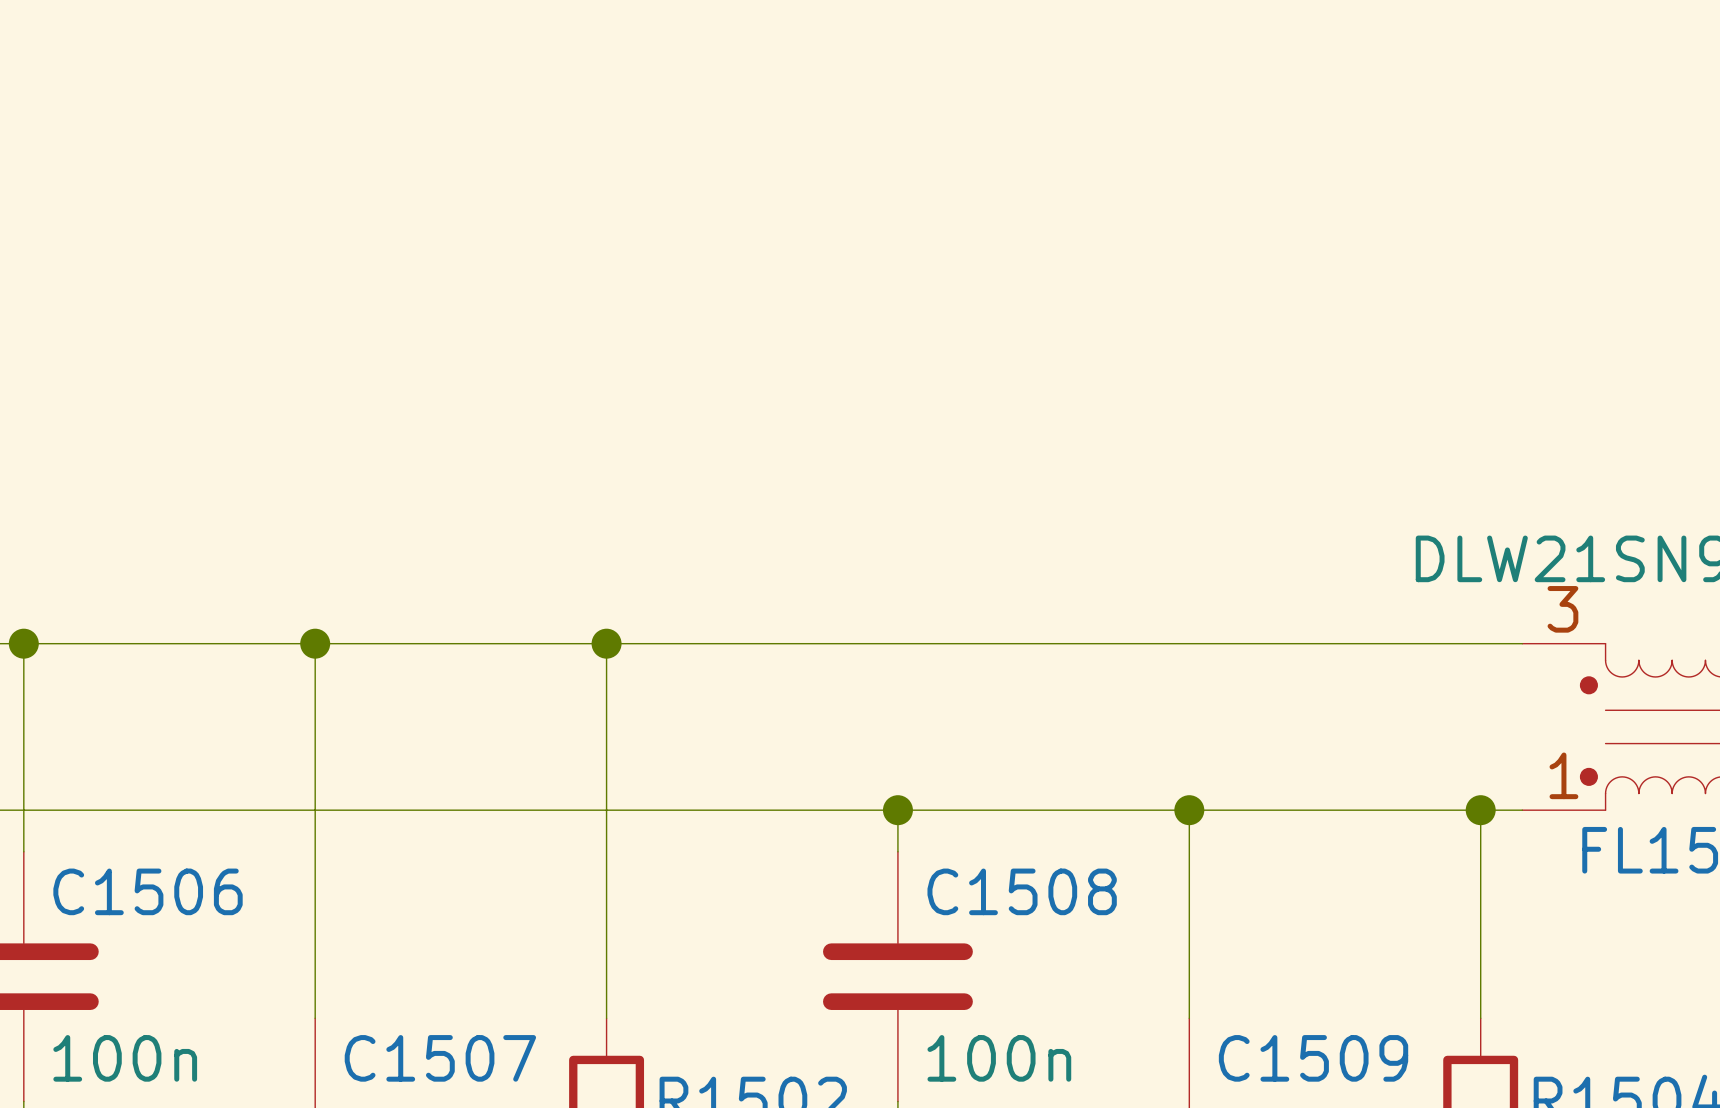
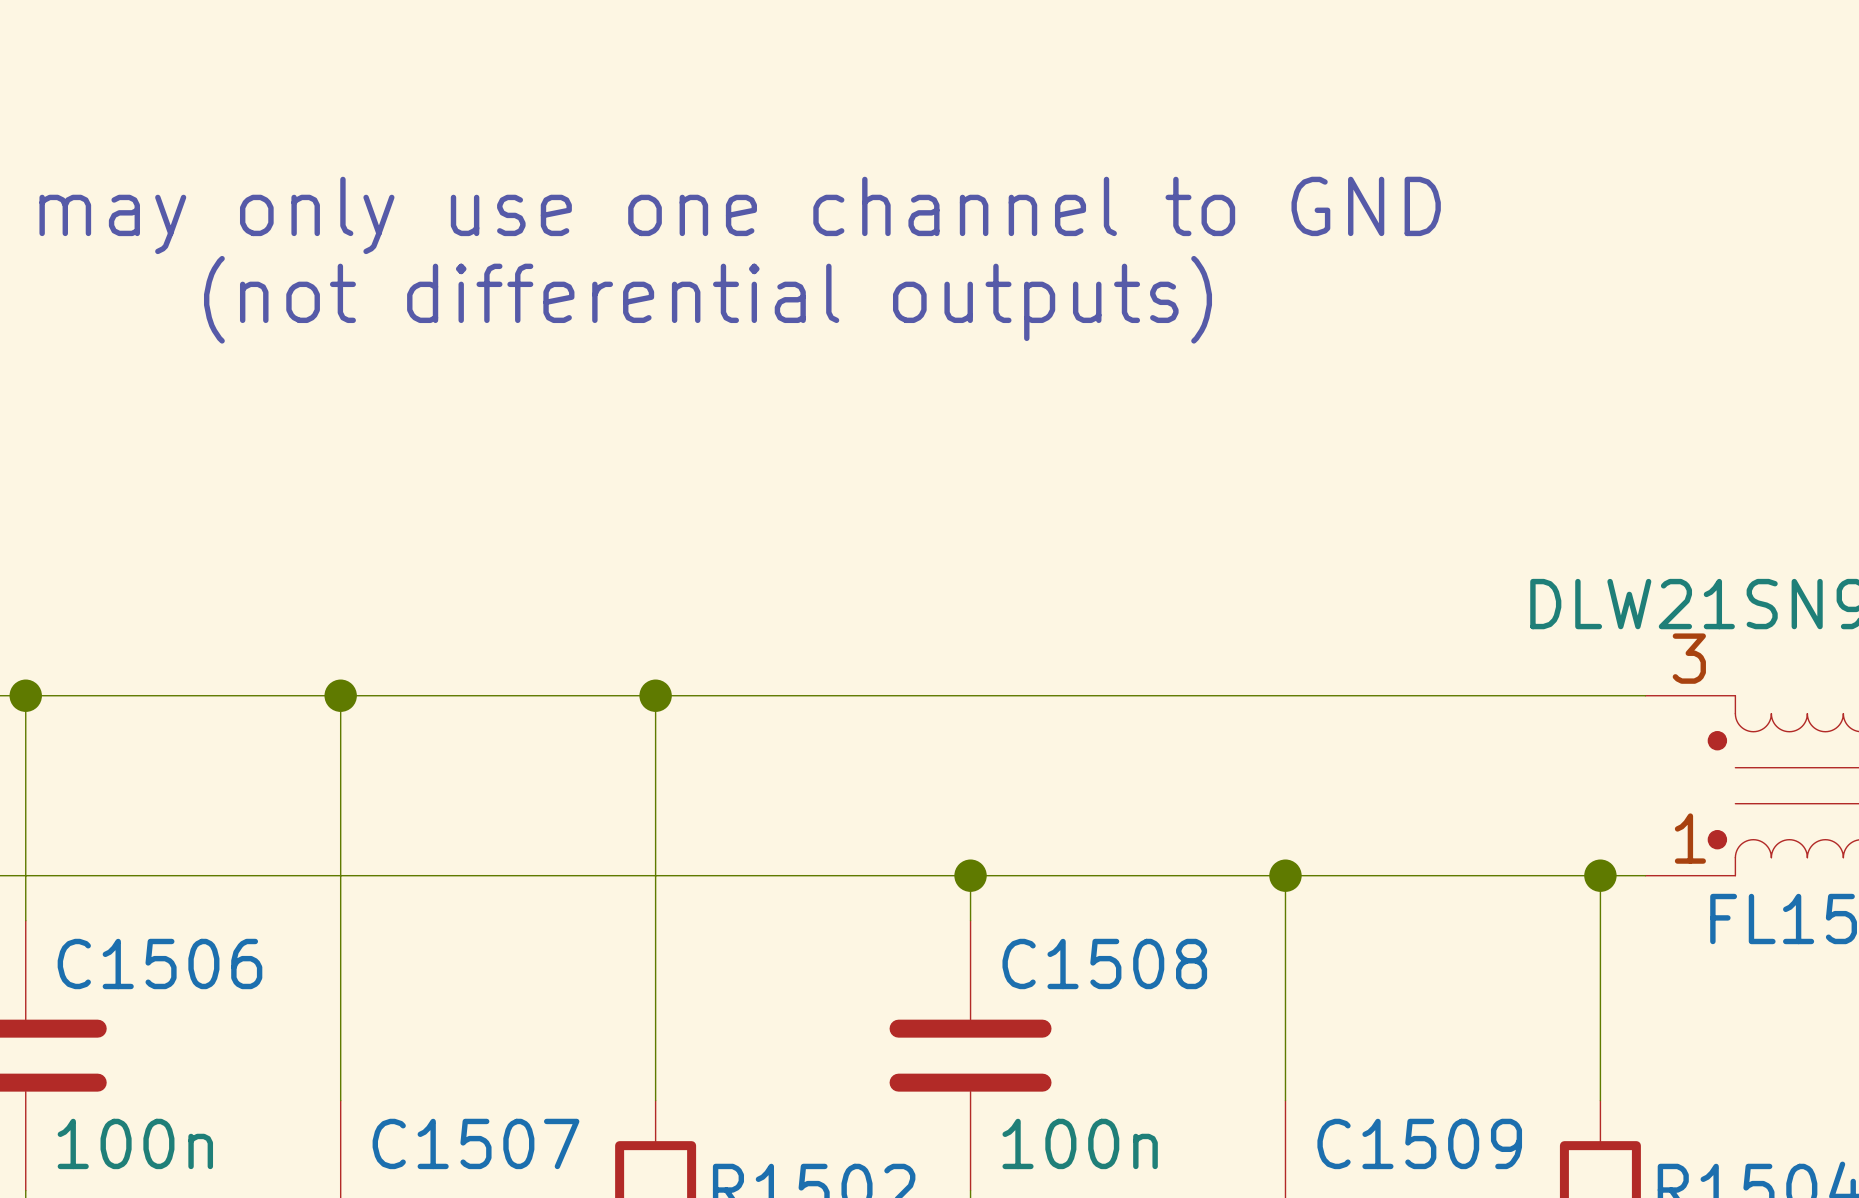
text: none -> may only use one channel to GND (740, 215)
text: none -> (not differential outputs) (708, 299)

